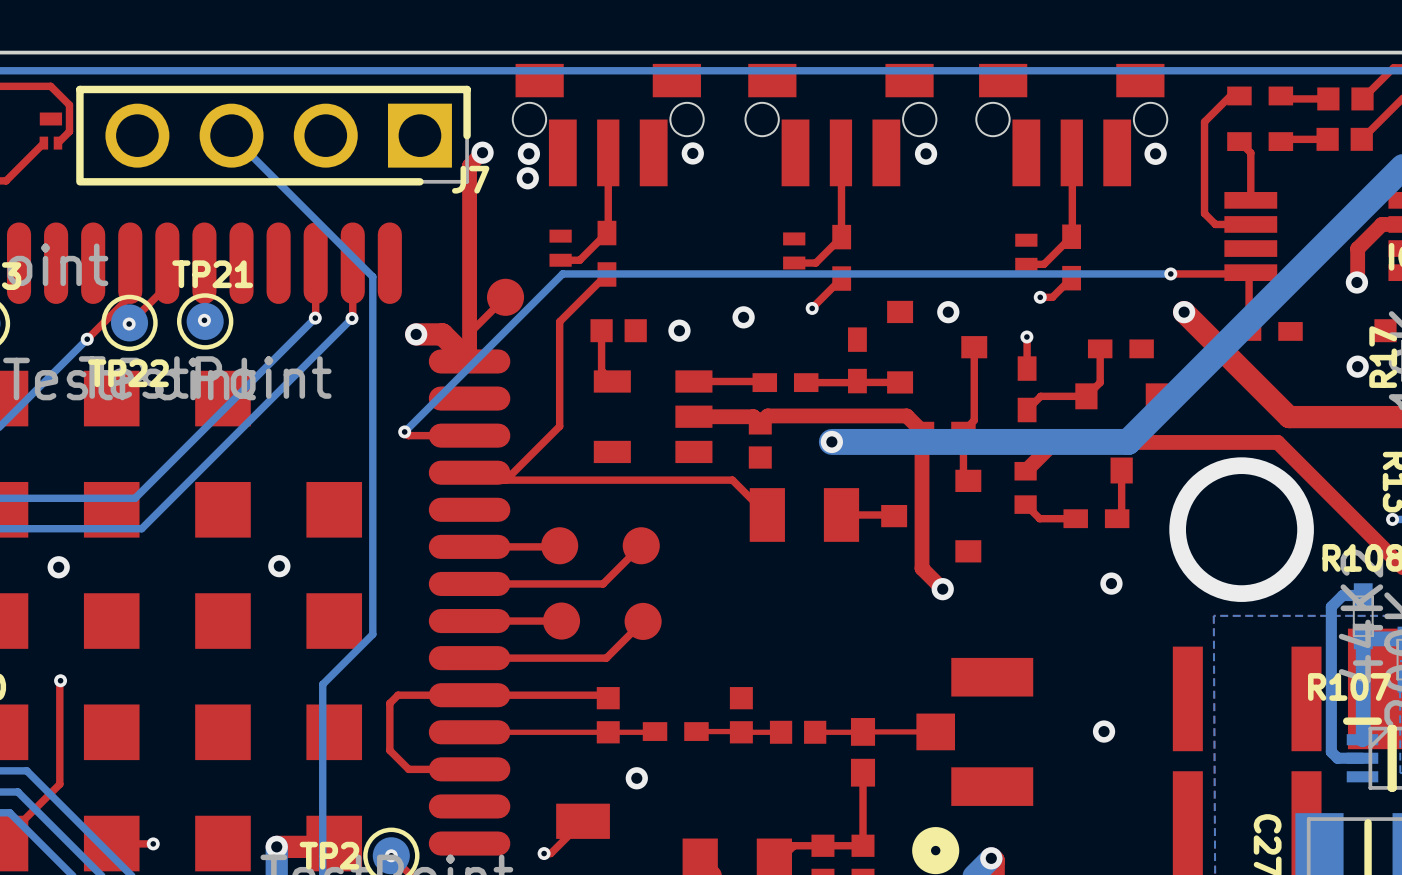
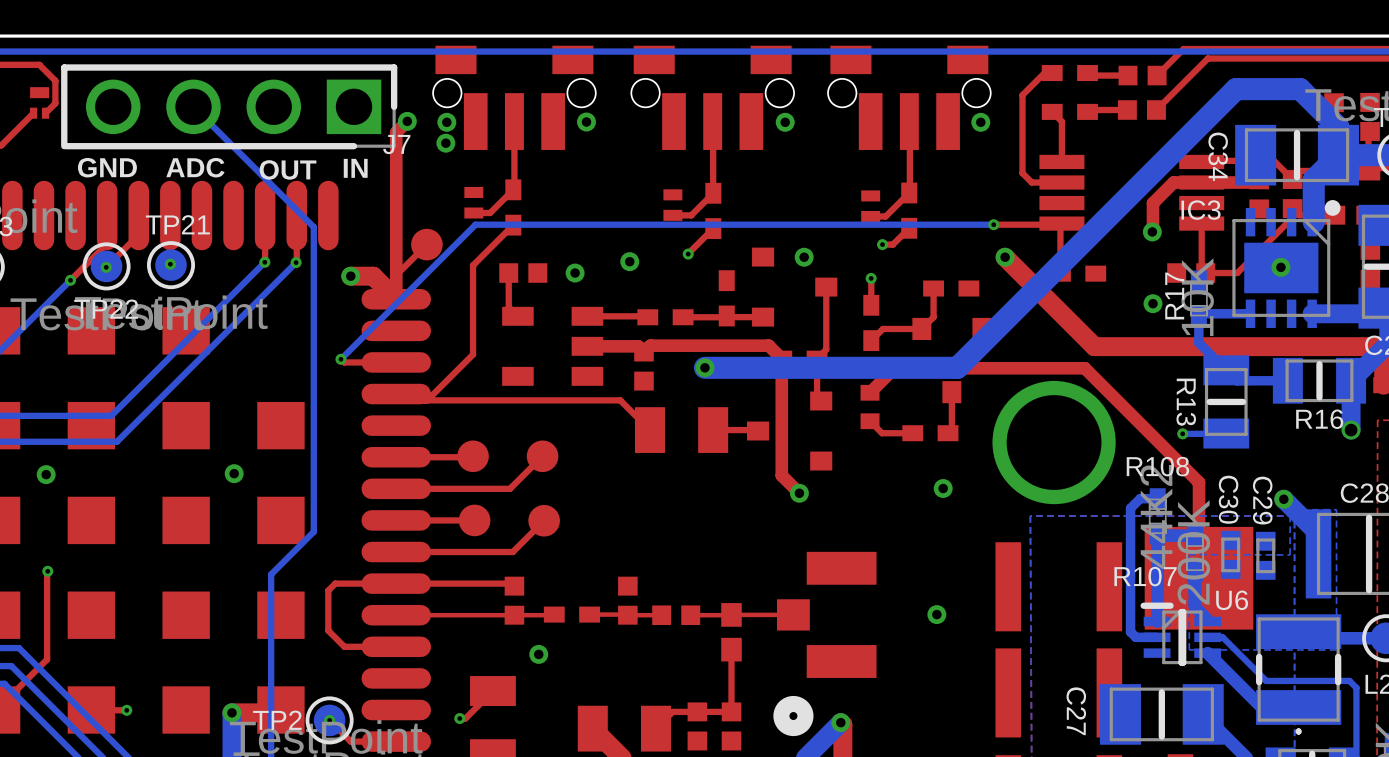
text: none -> GND (107, 167)
text: none -> ADC (195, 167)
text: none -> IN (355, 168)
text: none -> OUT (288, 169)

